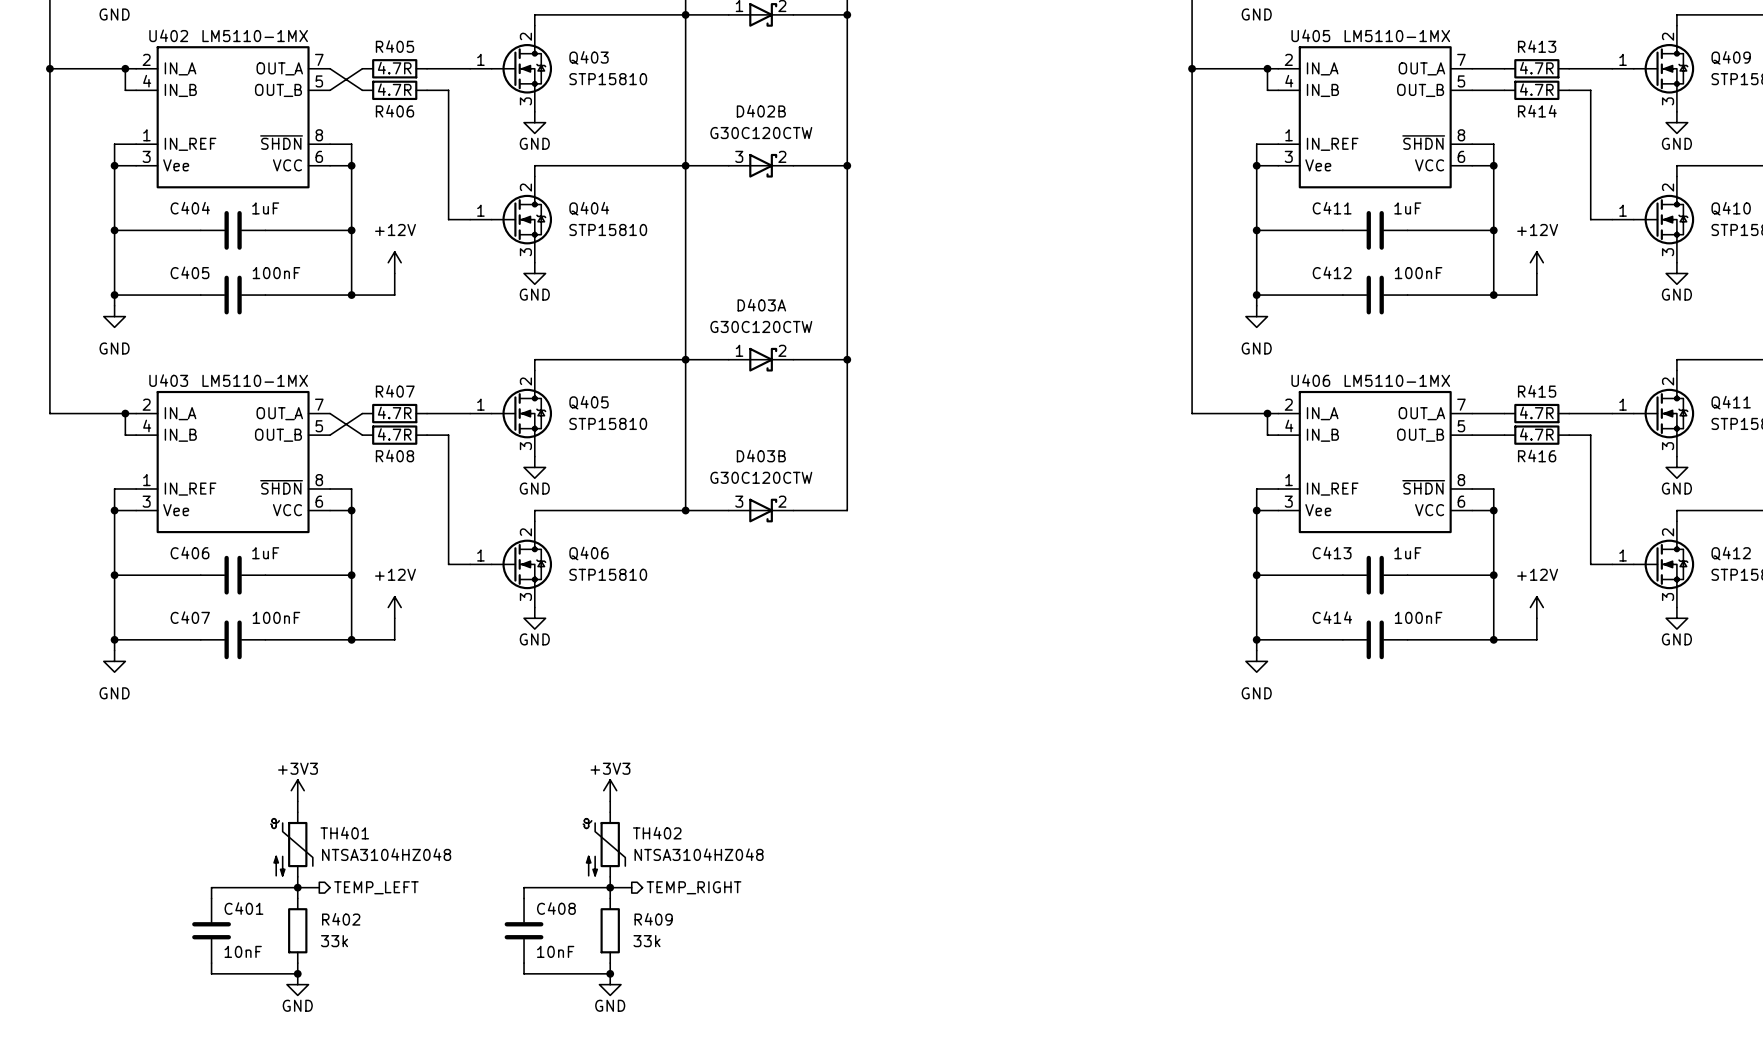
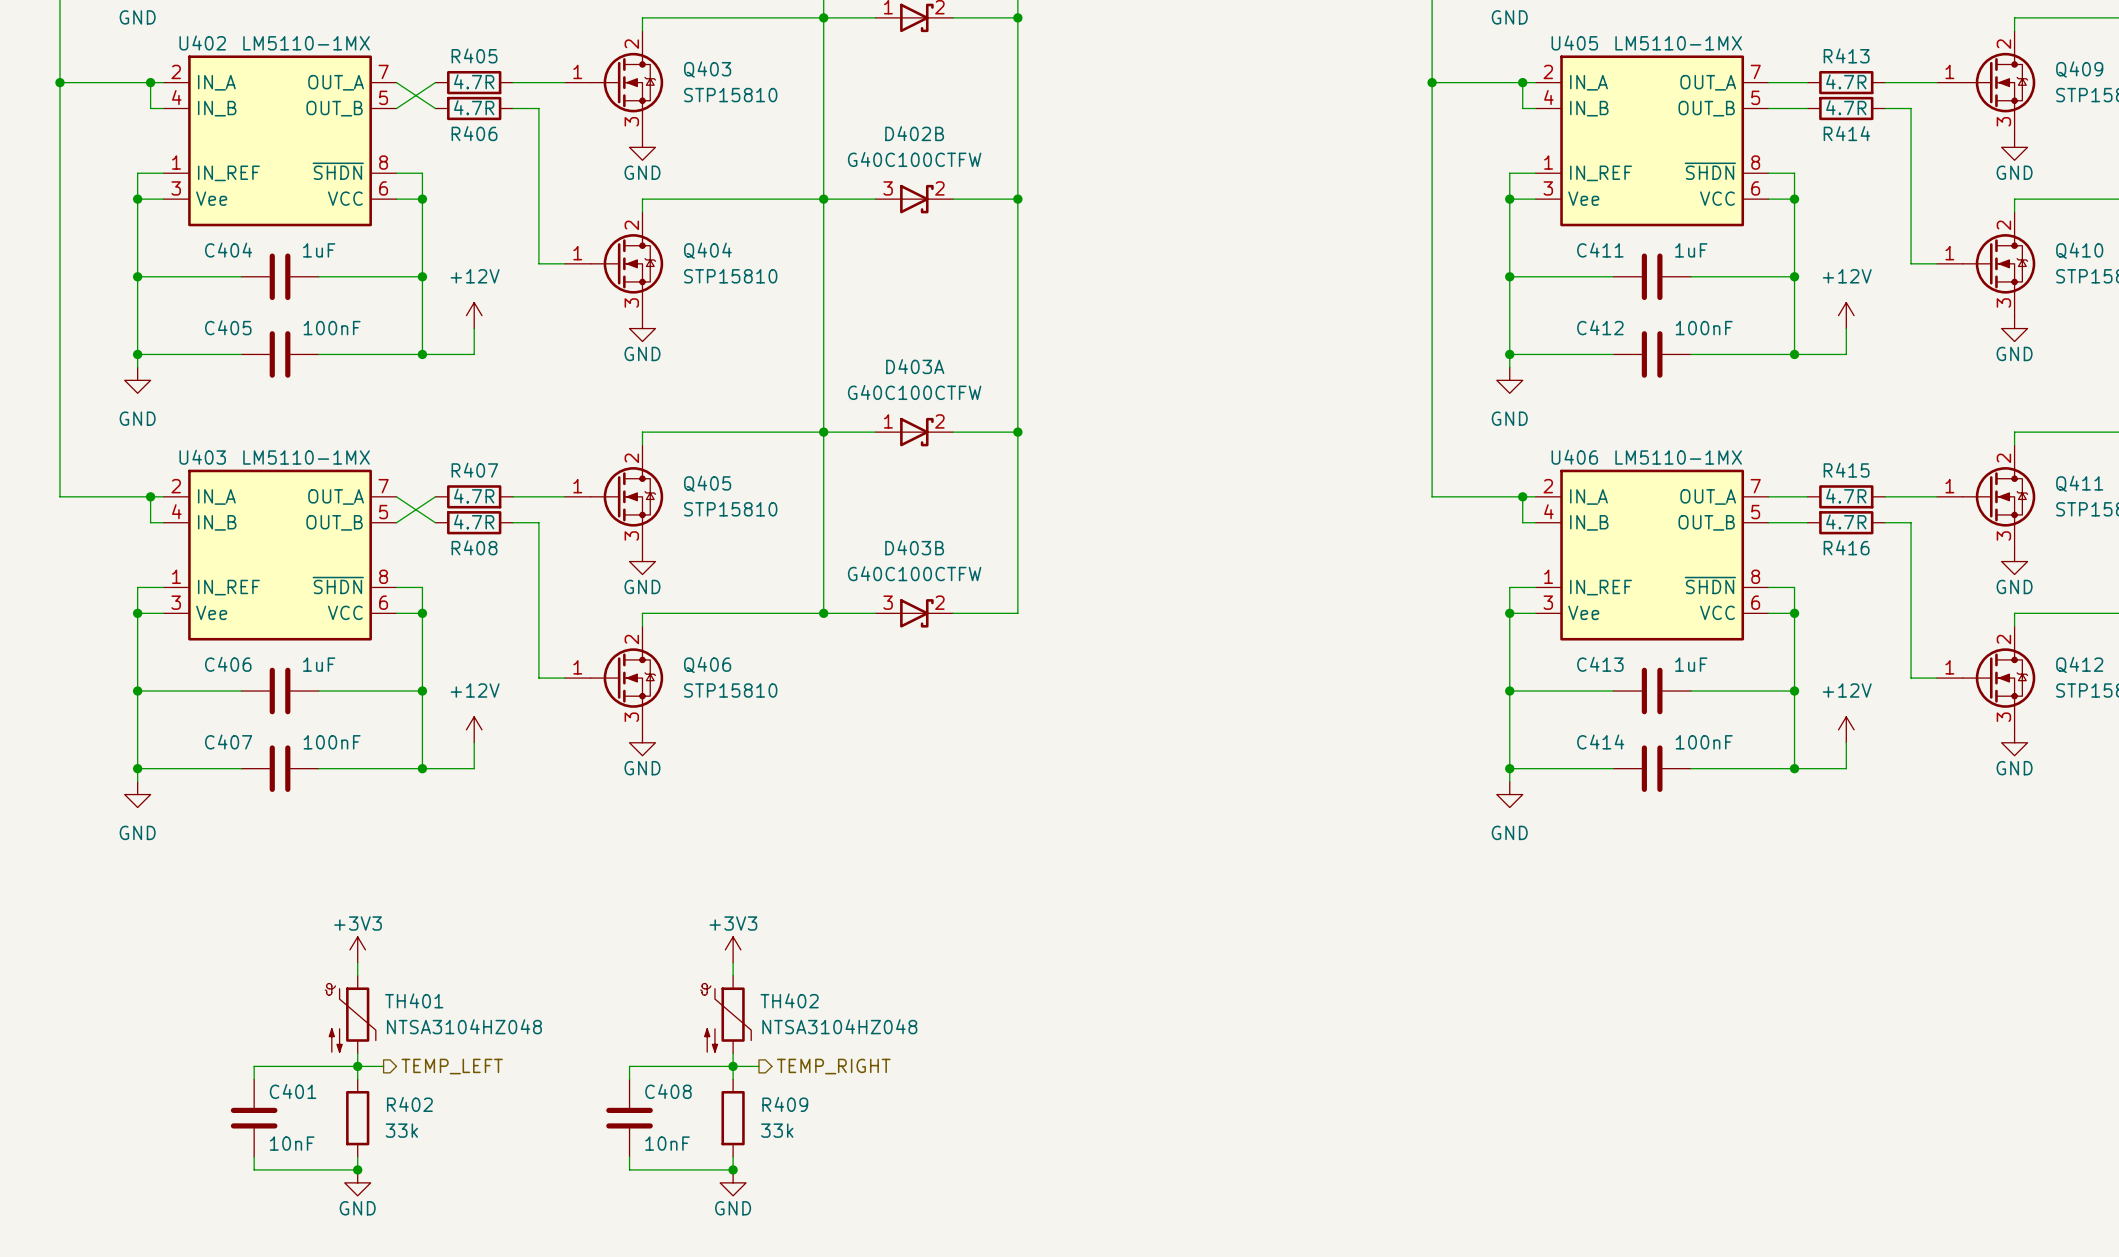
D402B value: G30C120CTW (761, 133) -> G40C100CTFW (914, 159)
D403A value: G30C120CTW (761, 326) -> G40C100CTFW (914, 392)
D403B value: G30C120CTW (761, 477) -> G40C100CTFW (914, 573)

